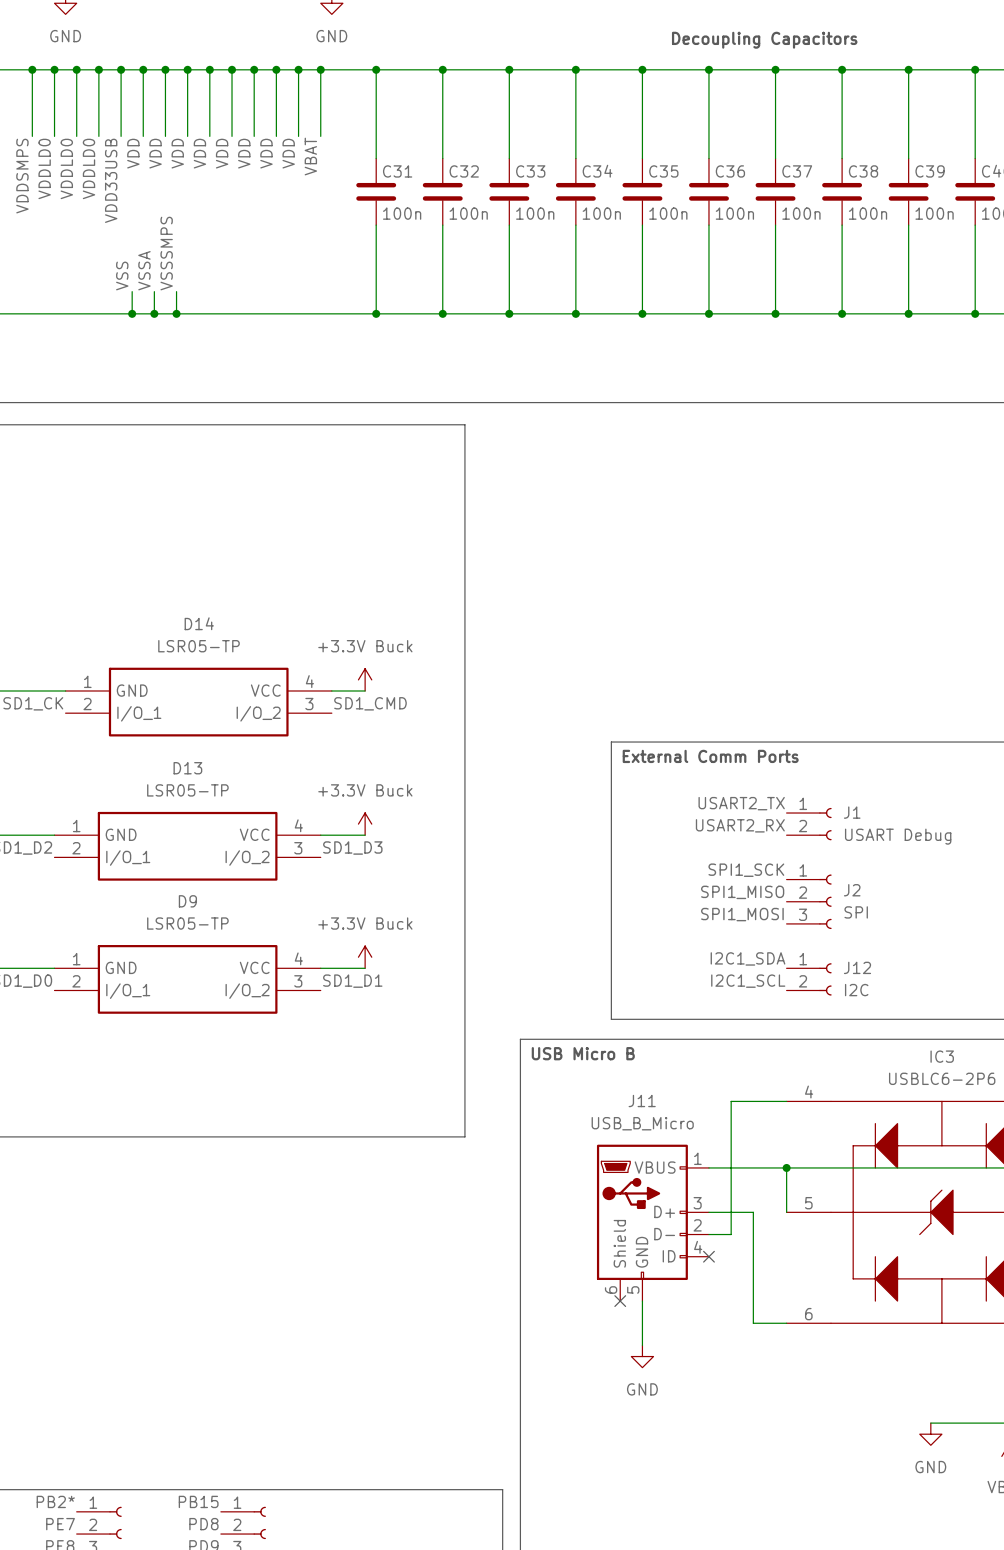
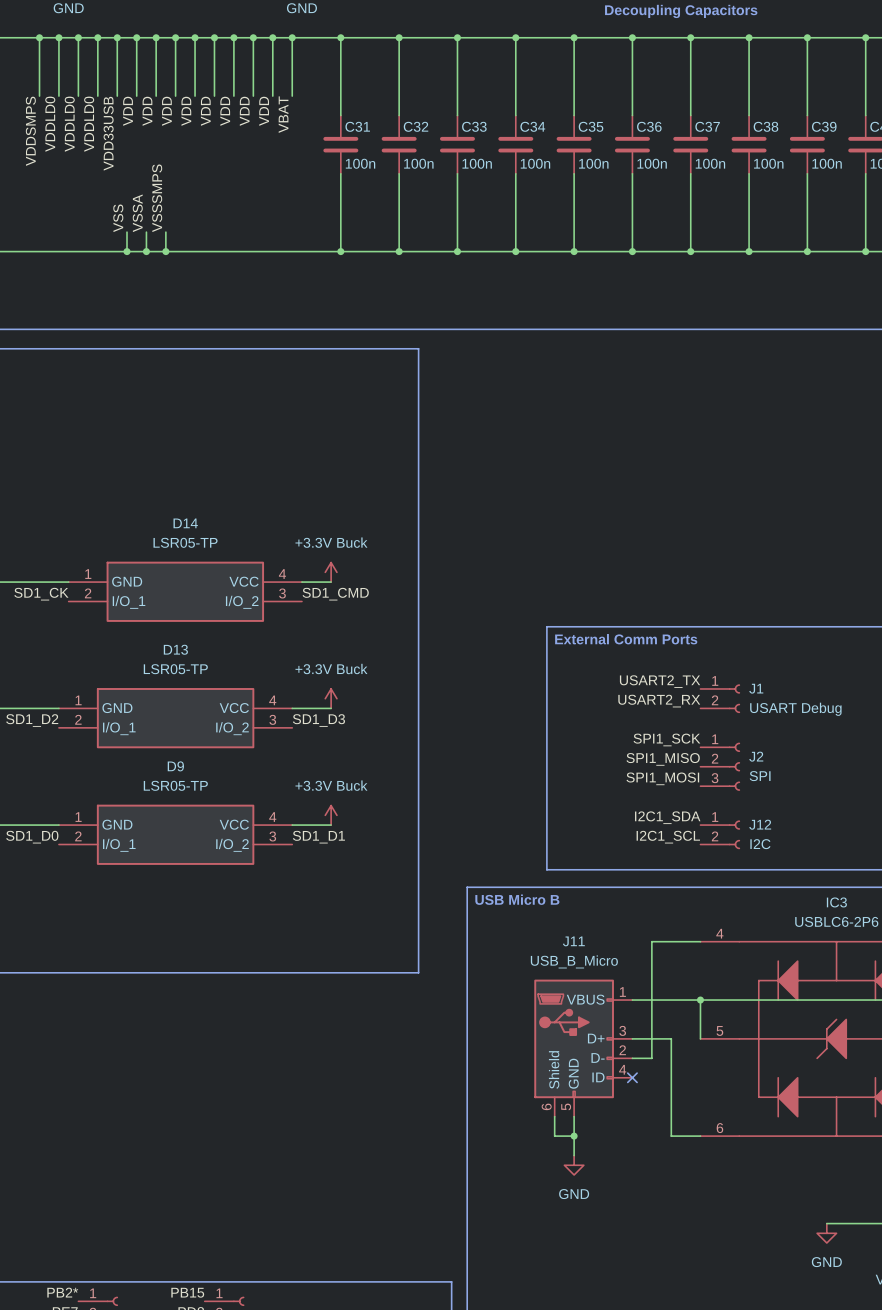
wire: none -> (554, 1116) (554, 1136) (574, 1136)
no-connect mark: (620, 1301) -> none
junction: none -> (574, 1136)

